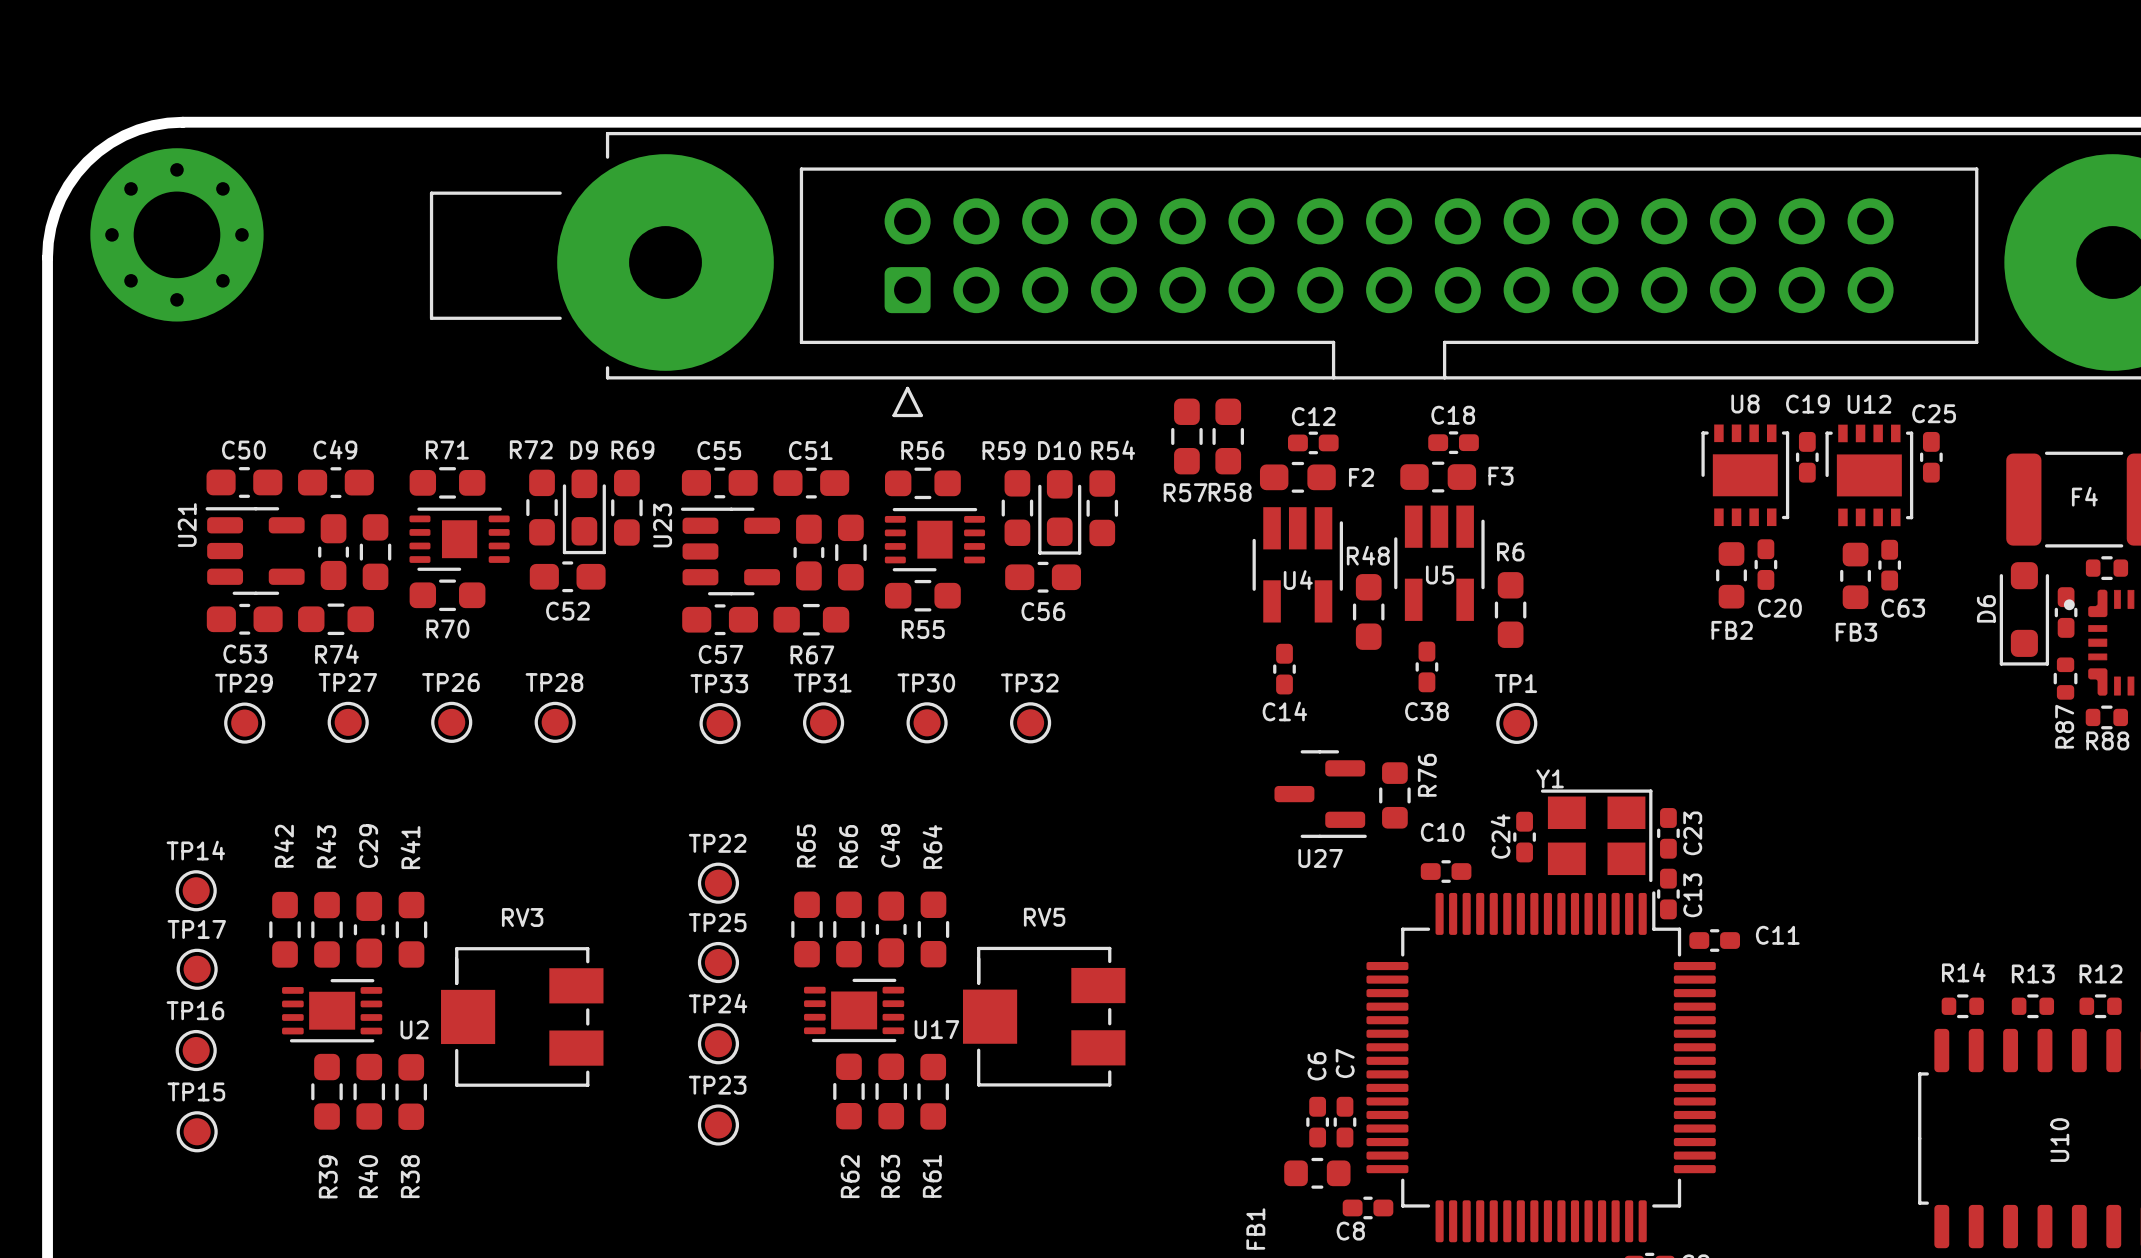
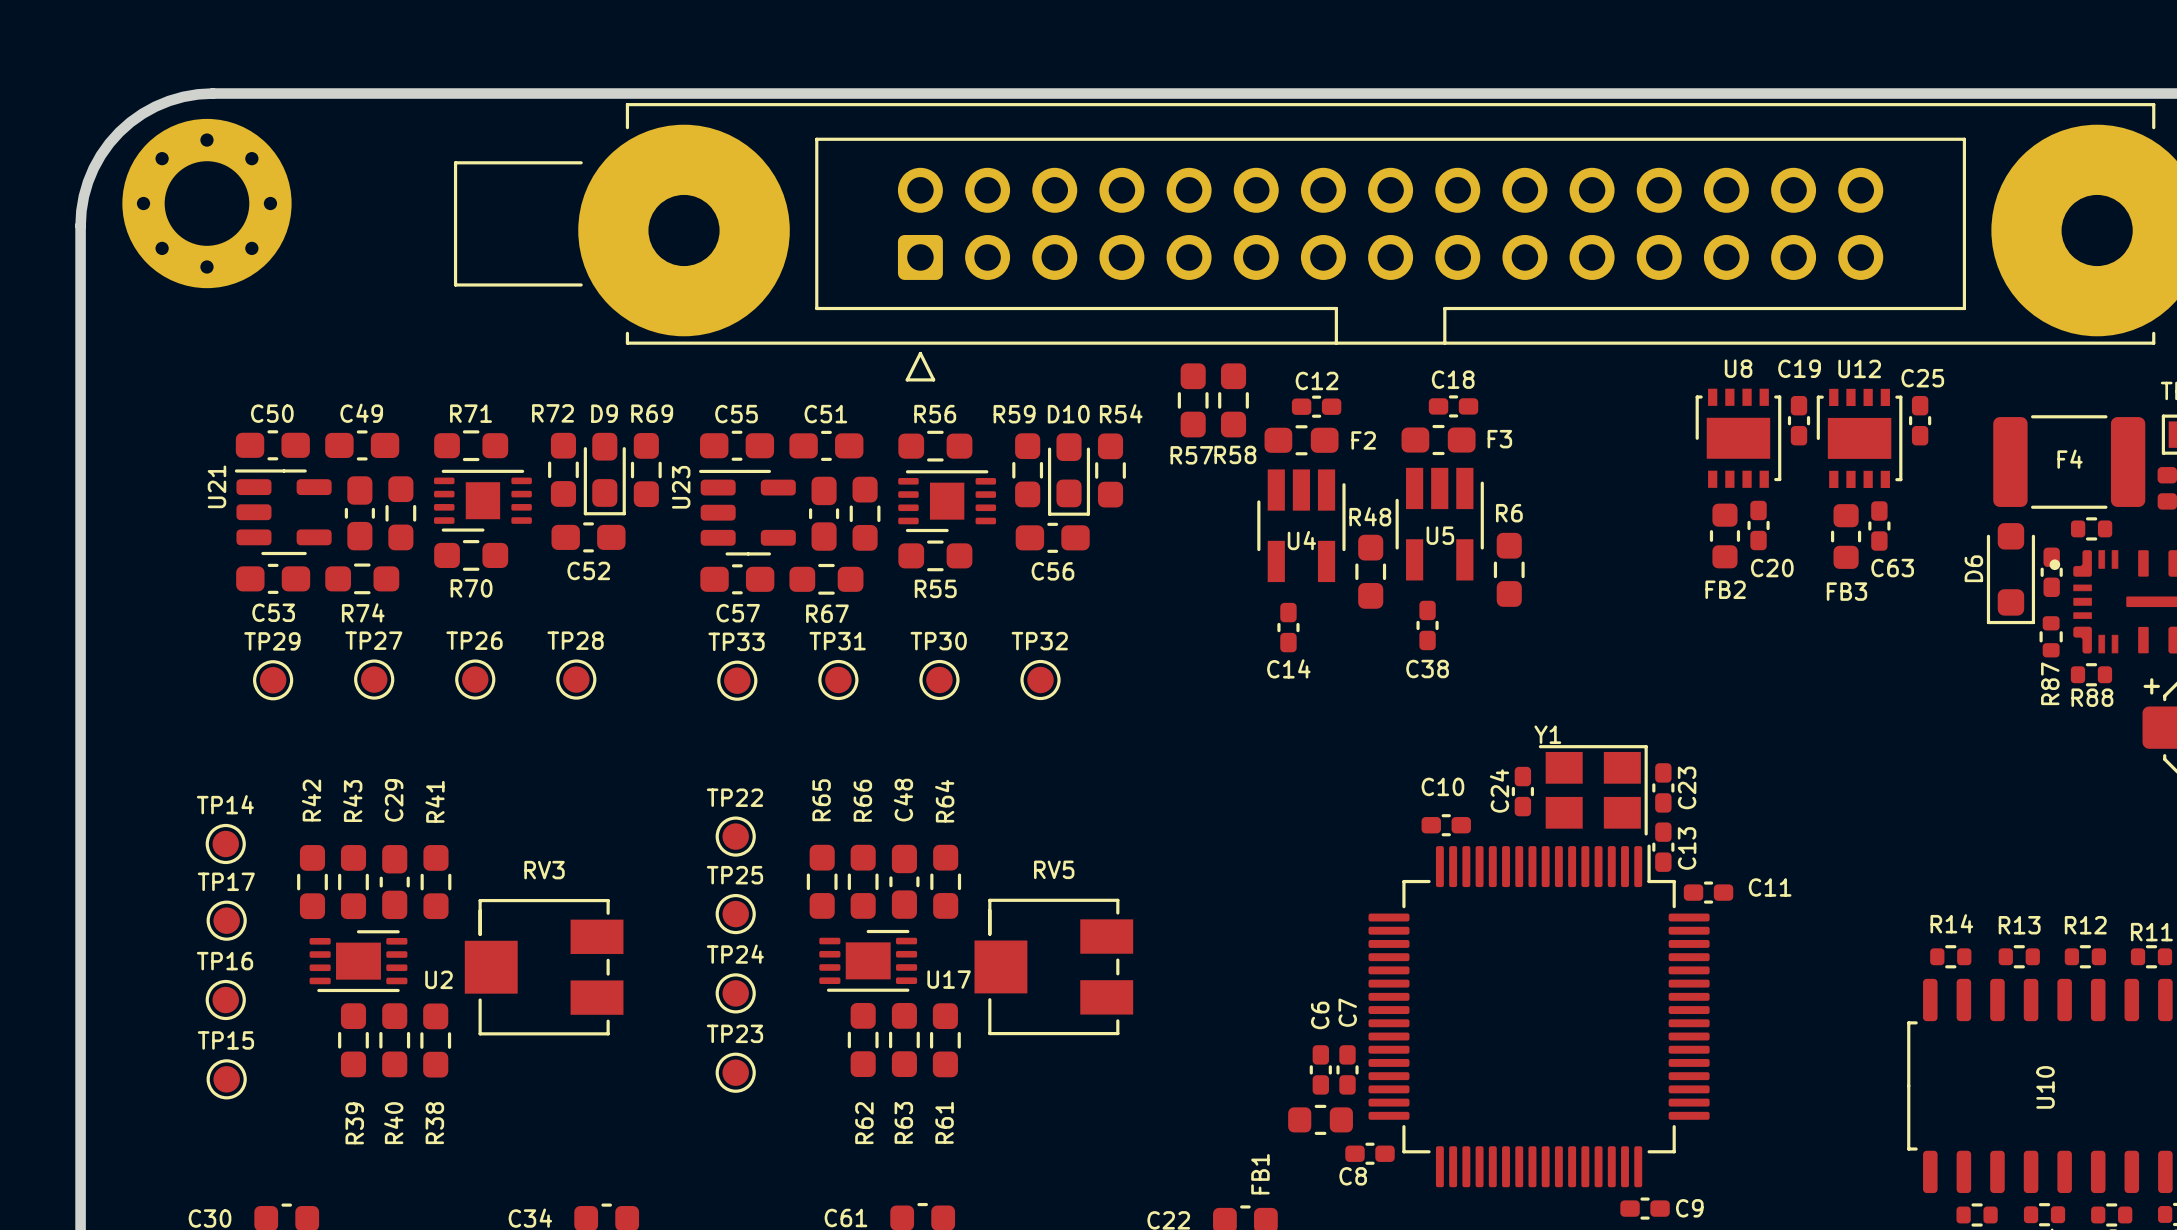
TP1: (1516, 723) -> none
U27: (1320, 794) -> none
R76: (1394, 795) -> none

